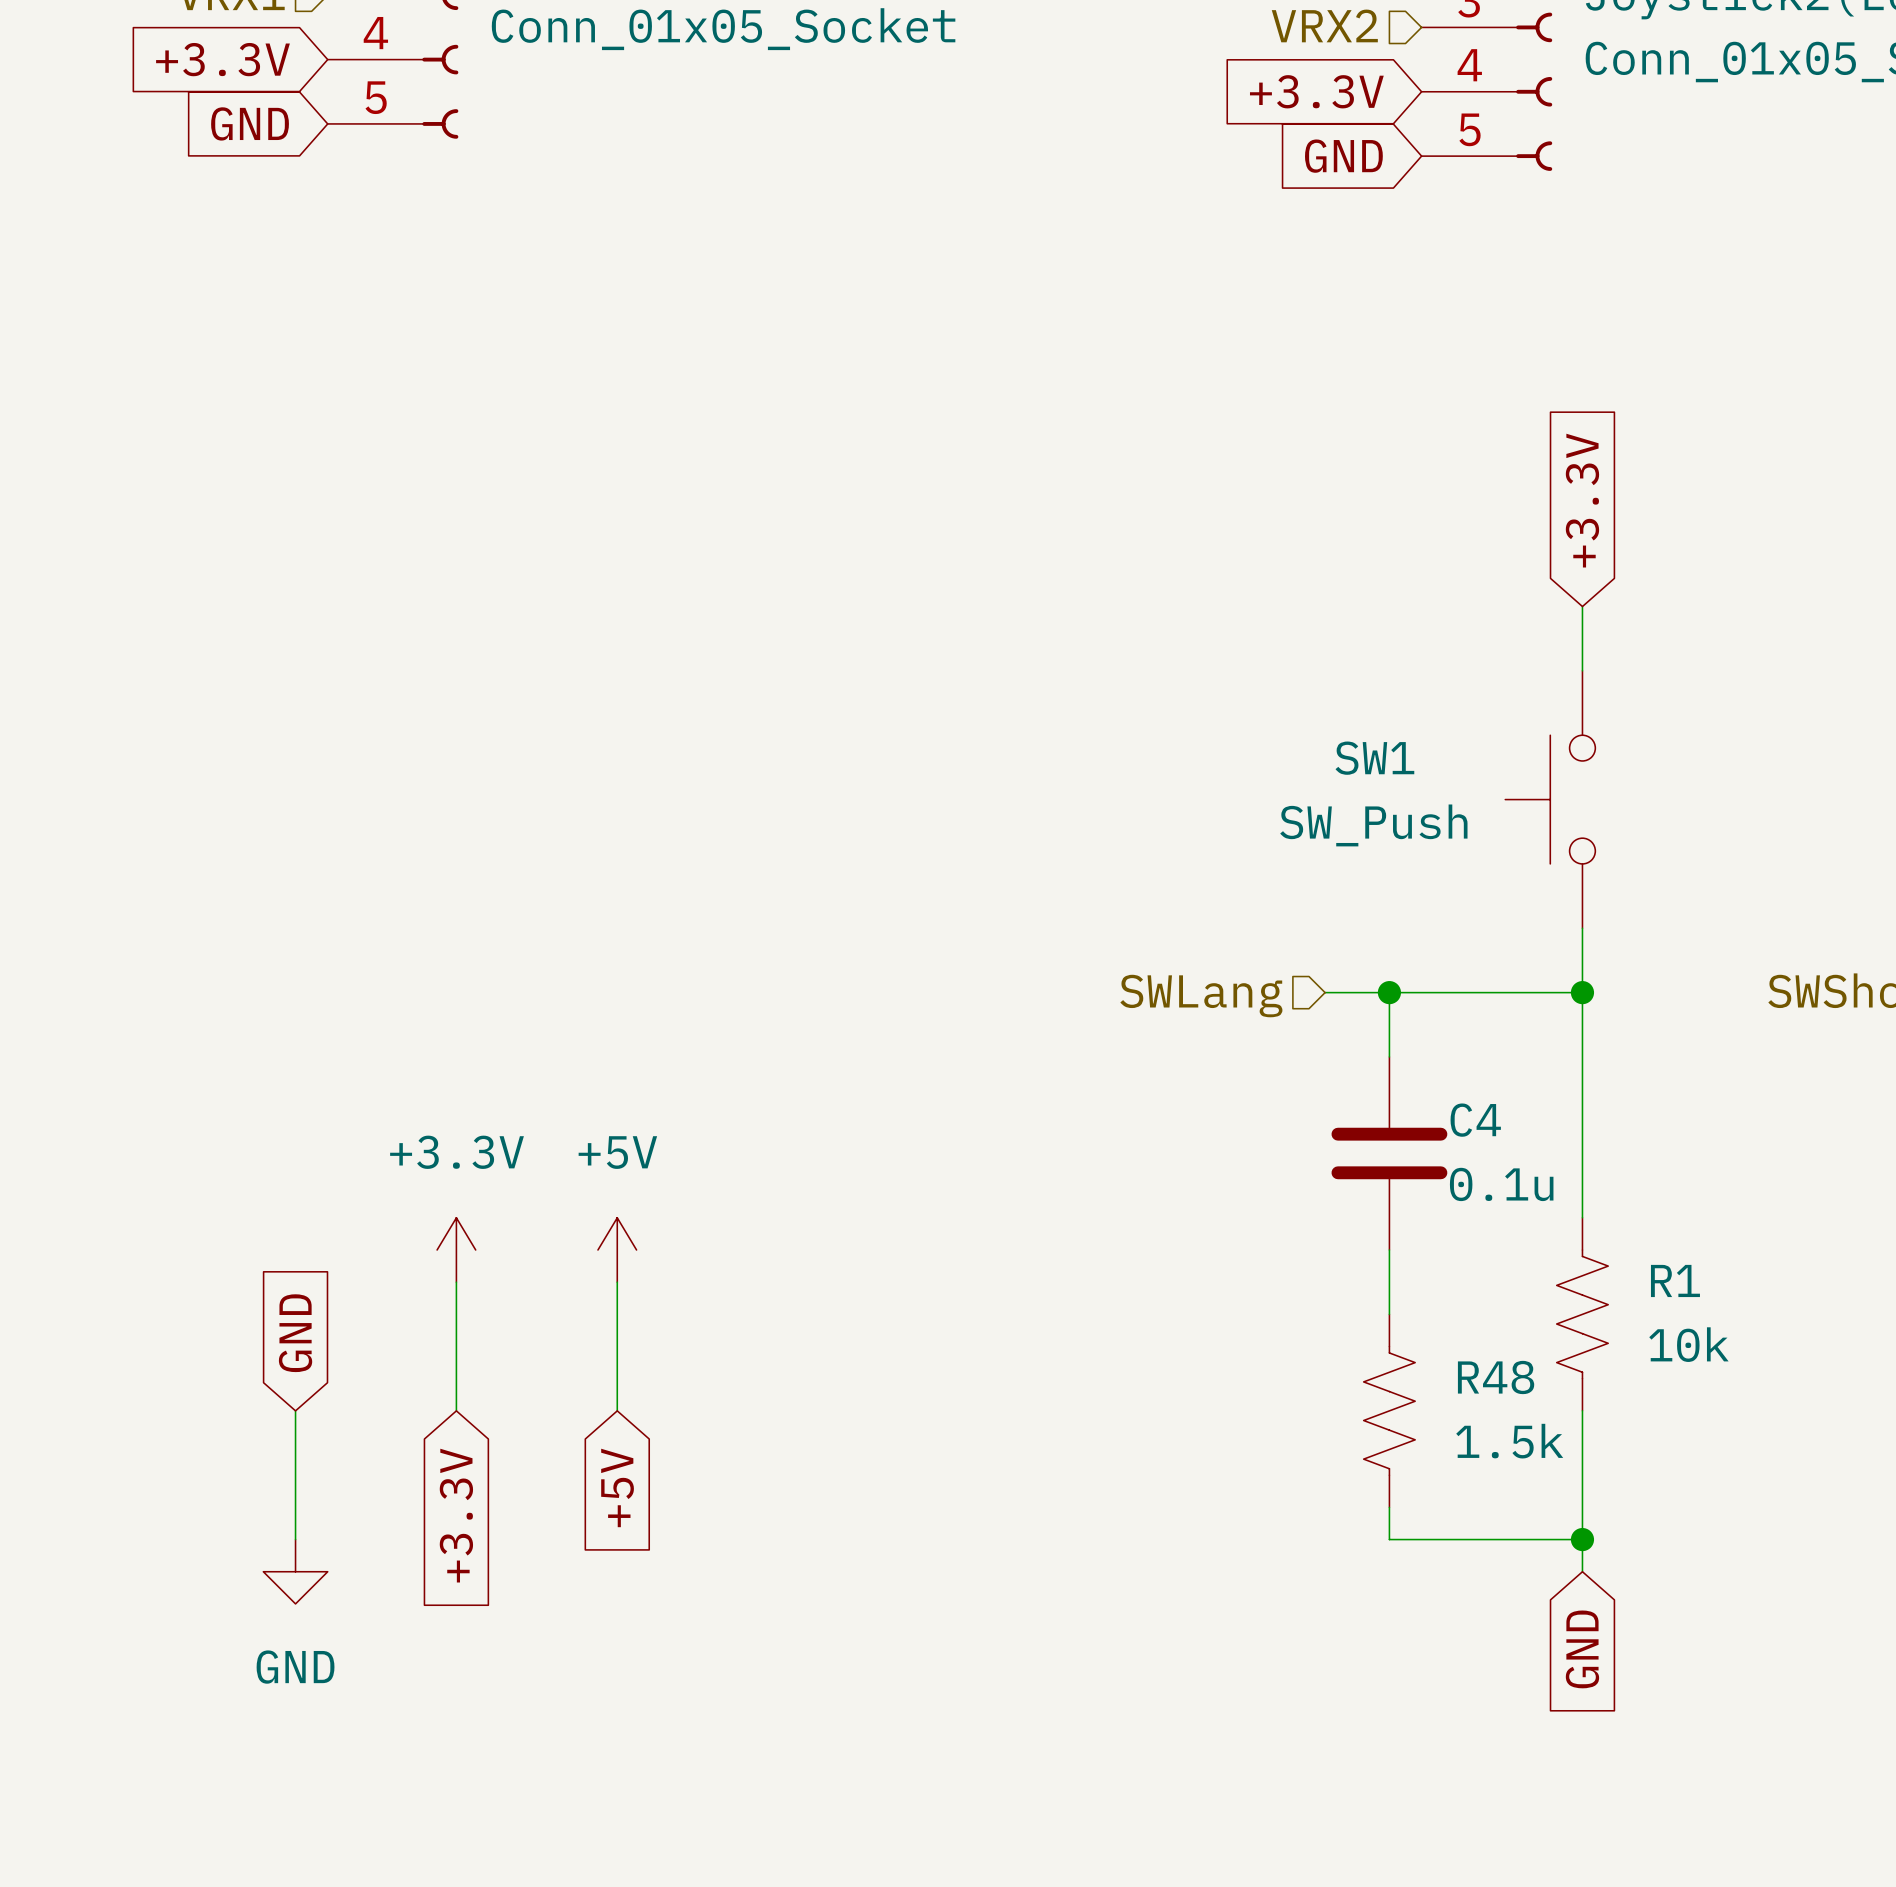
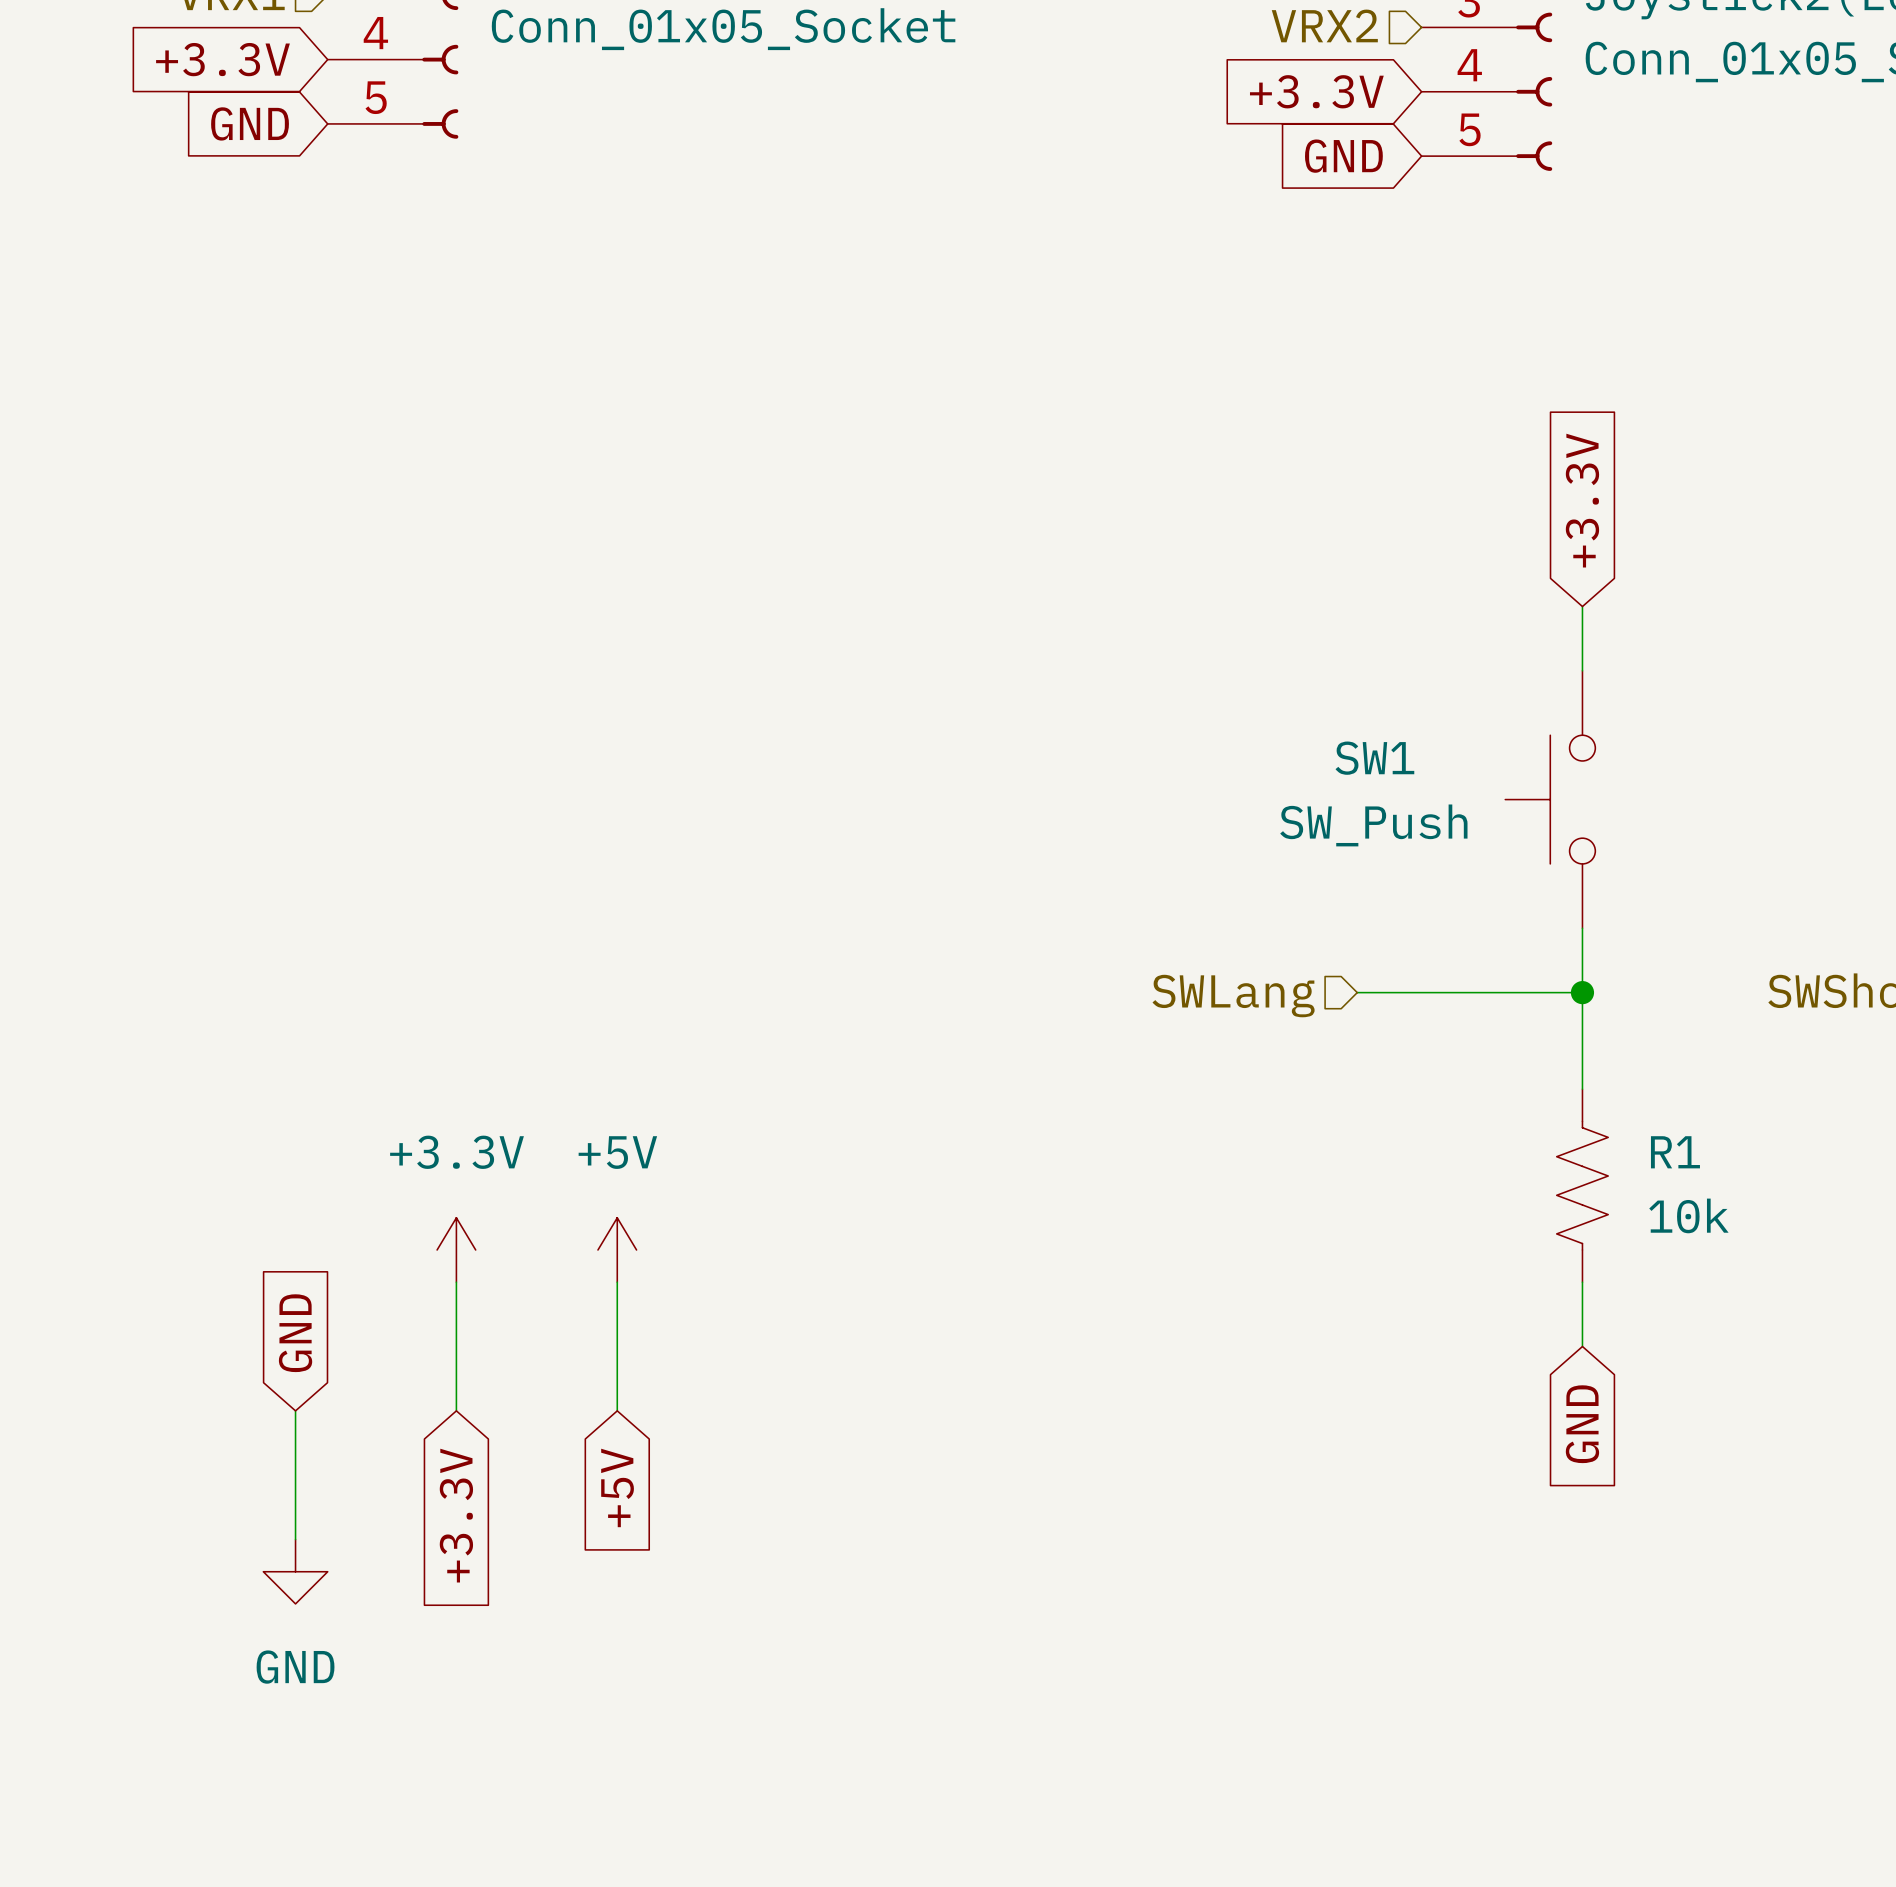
wire: (1325, 992) (1357, 992) -> none
wire: (1389, 992) (1389, 1056) -> none
junction: (1389, 992) -> none
hierarchical label position: SWLang (1201, 996) -> SWLang (1233, 996)
wire: (1582, 1089) (1582, 1217) -> none
C4: 0.1u (1389, 1153) -> none
wire: (1389, 1250) (1389, 1314) -> (1582, 1282) (1582, 1346)
R1 position: (1582, 1314) -> (1582, 1185)
R48: 1.5k (1389, 1410) -> none
wire: (1582, 1410) (1582, 1571) -> none
wire: (1389, 1507) (1389, 1539) (1582, 1539) -> none
junction: (1582, 1539) -> none
global label position: GND (1582, 1649) -> GND (1582, 1424)

